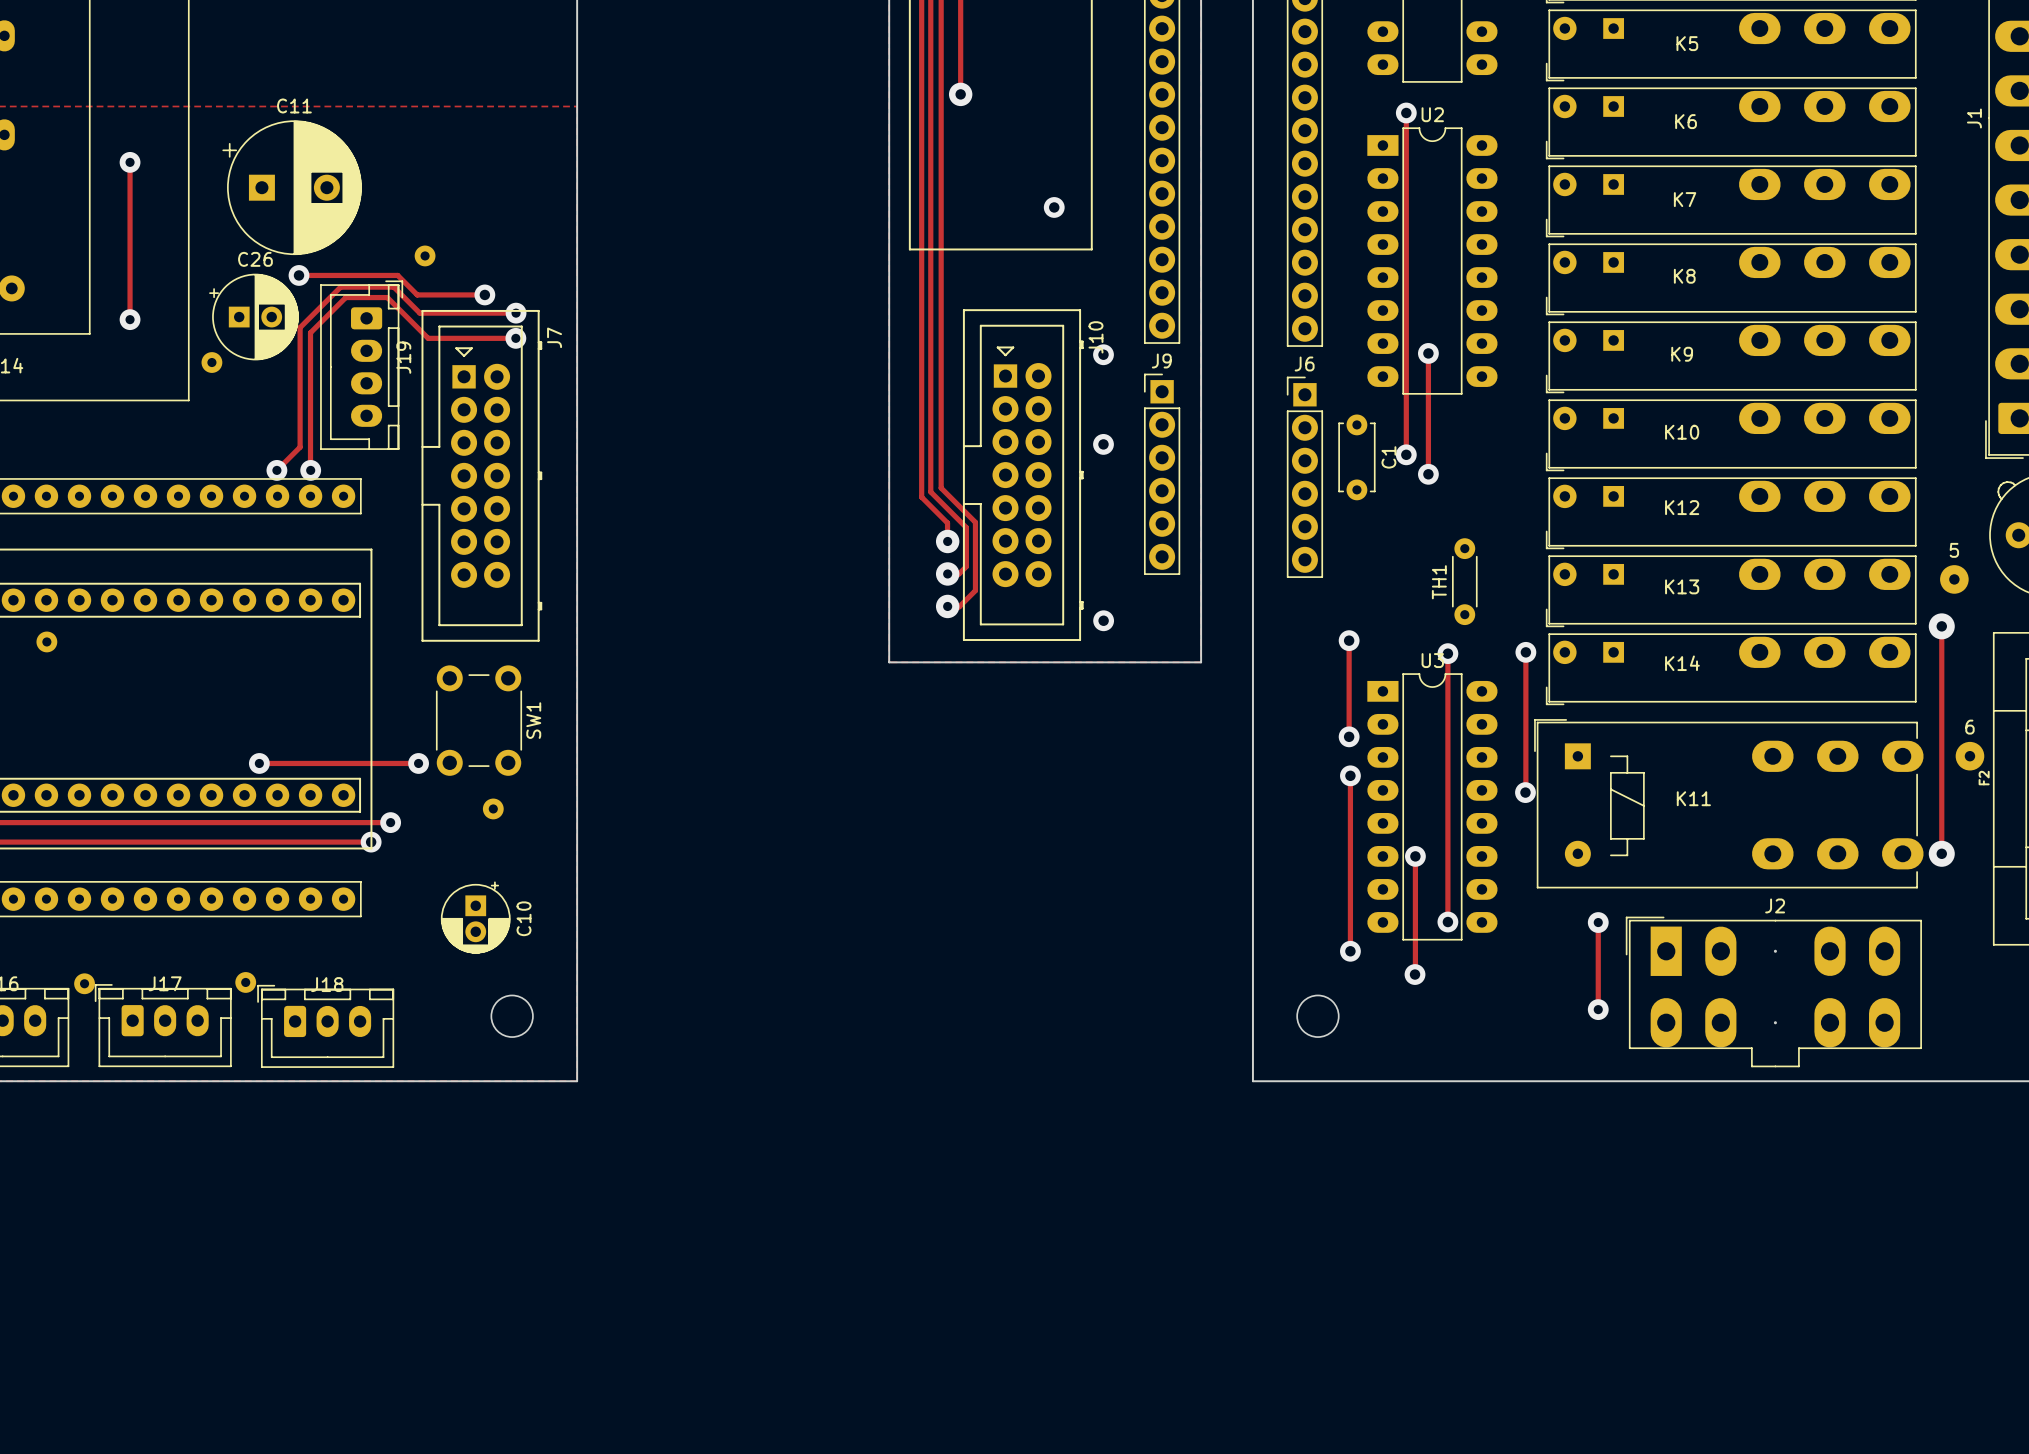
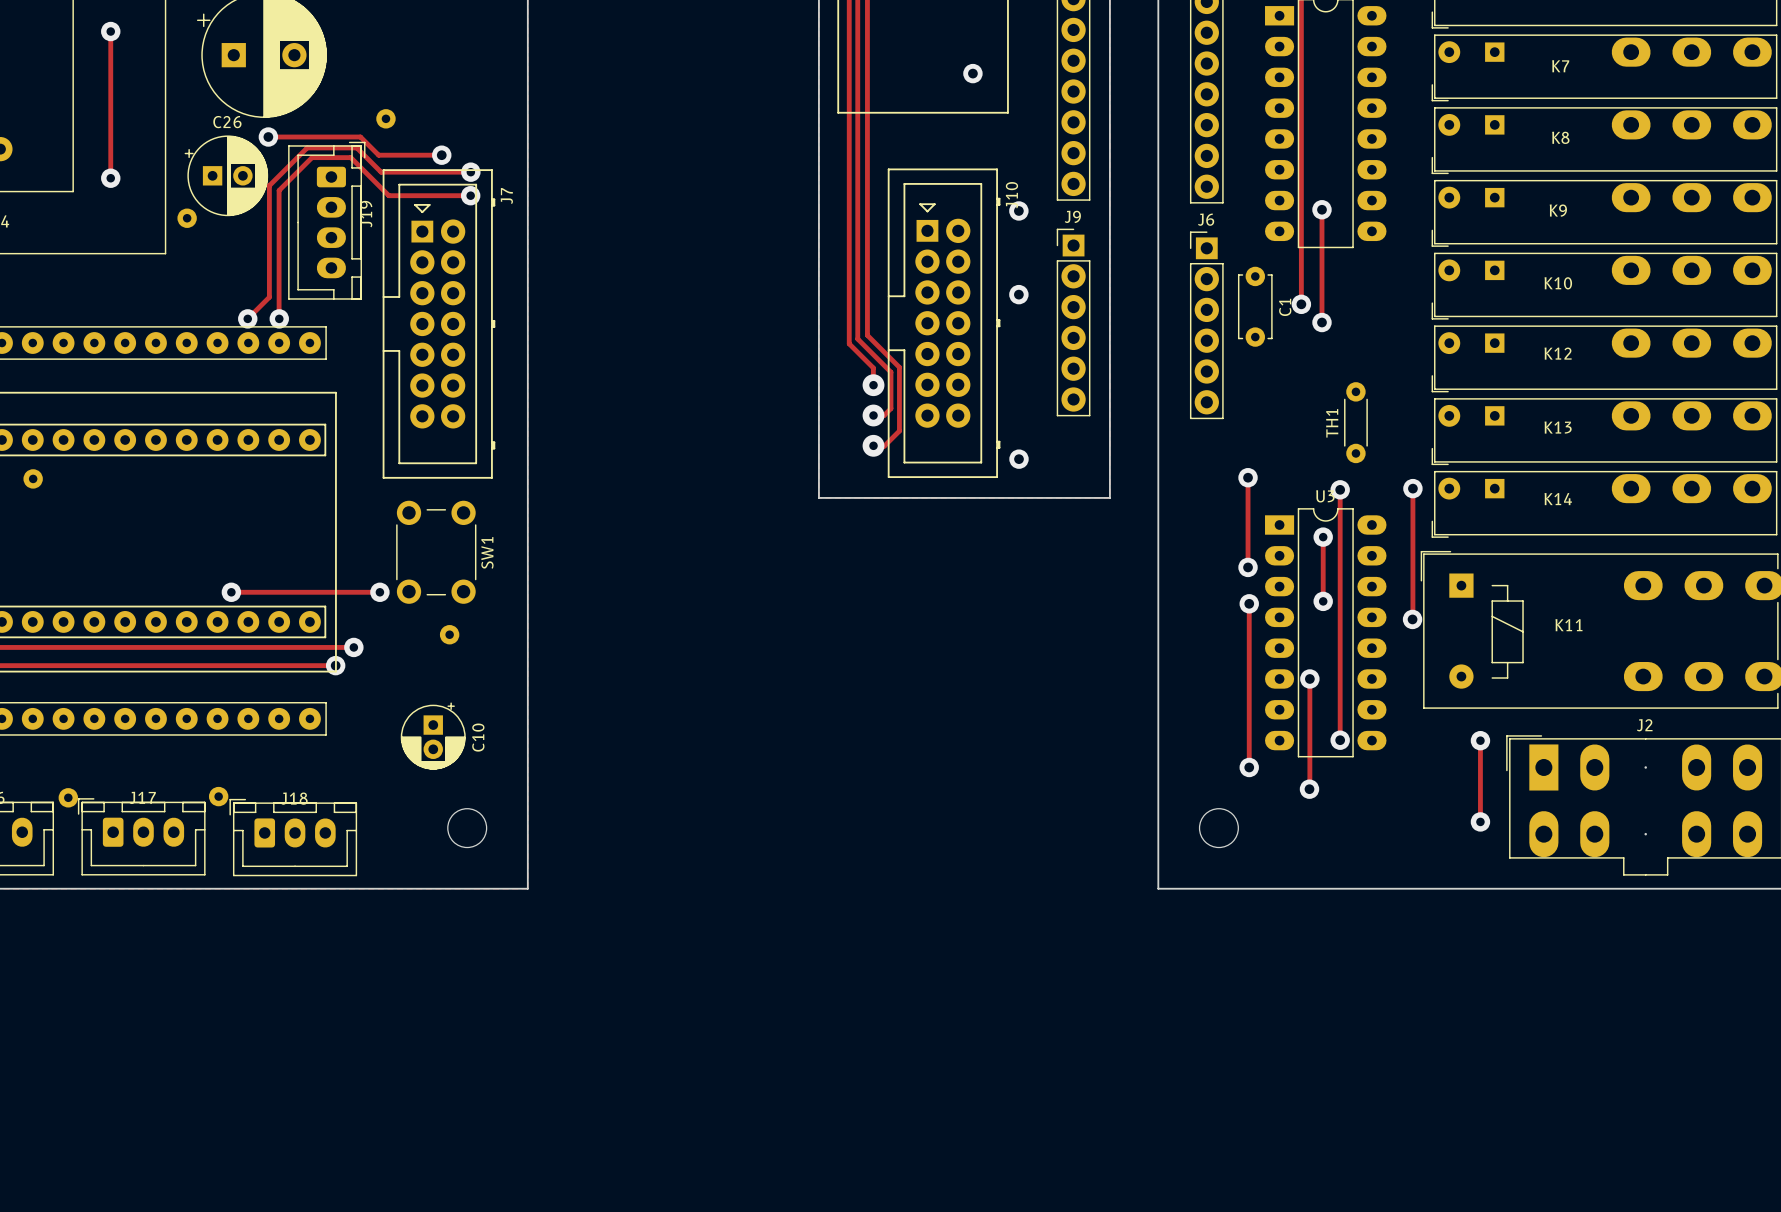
track: none -> (1323, 537) (1323, 601)
via: none -> (1323, 537)
via: none -> (1323, 601)

